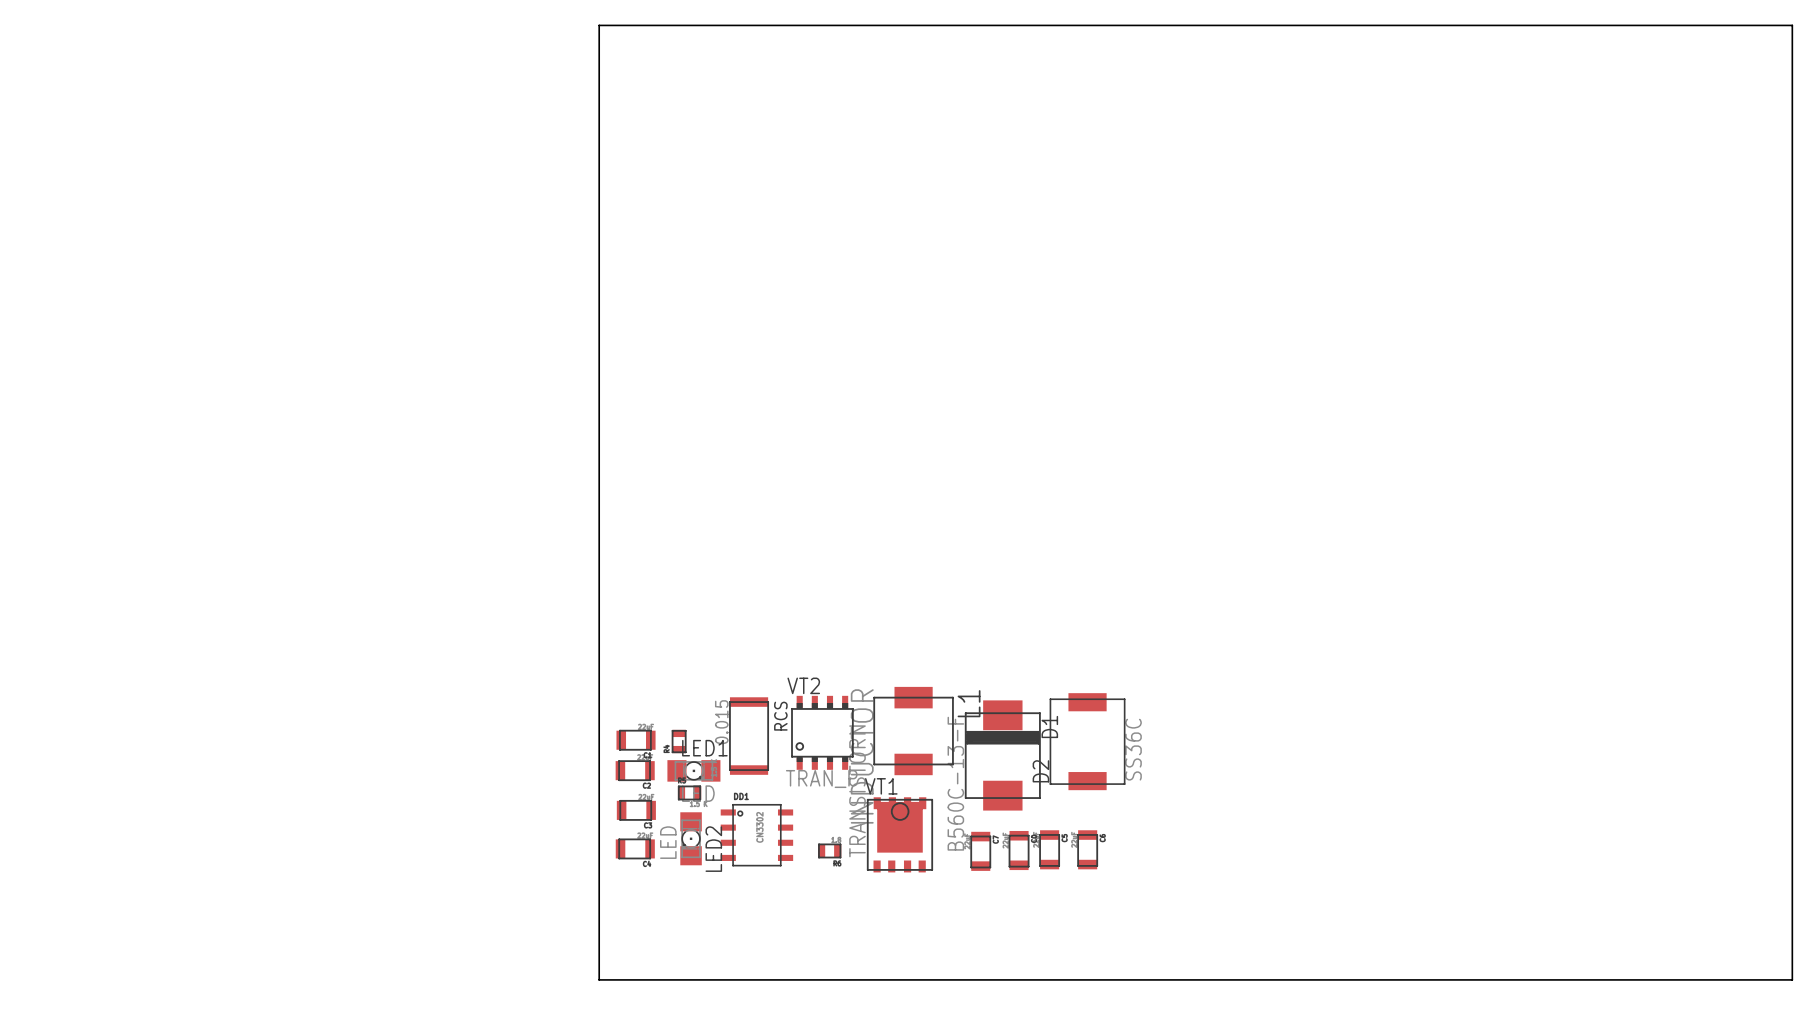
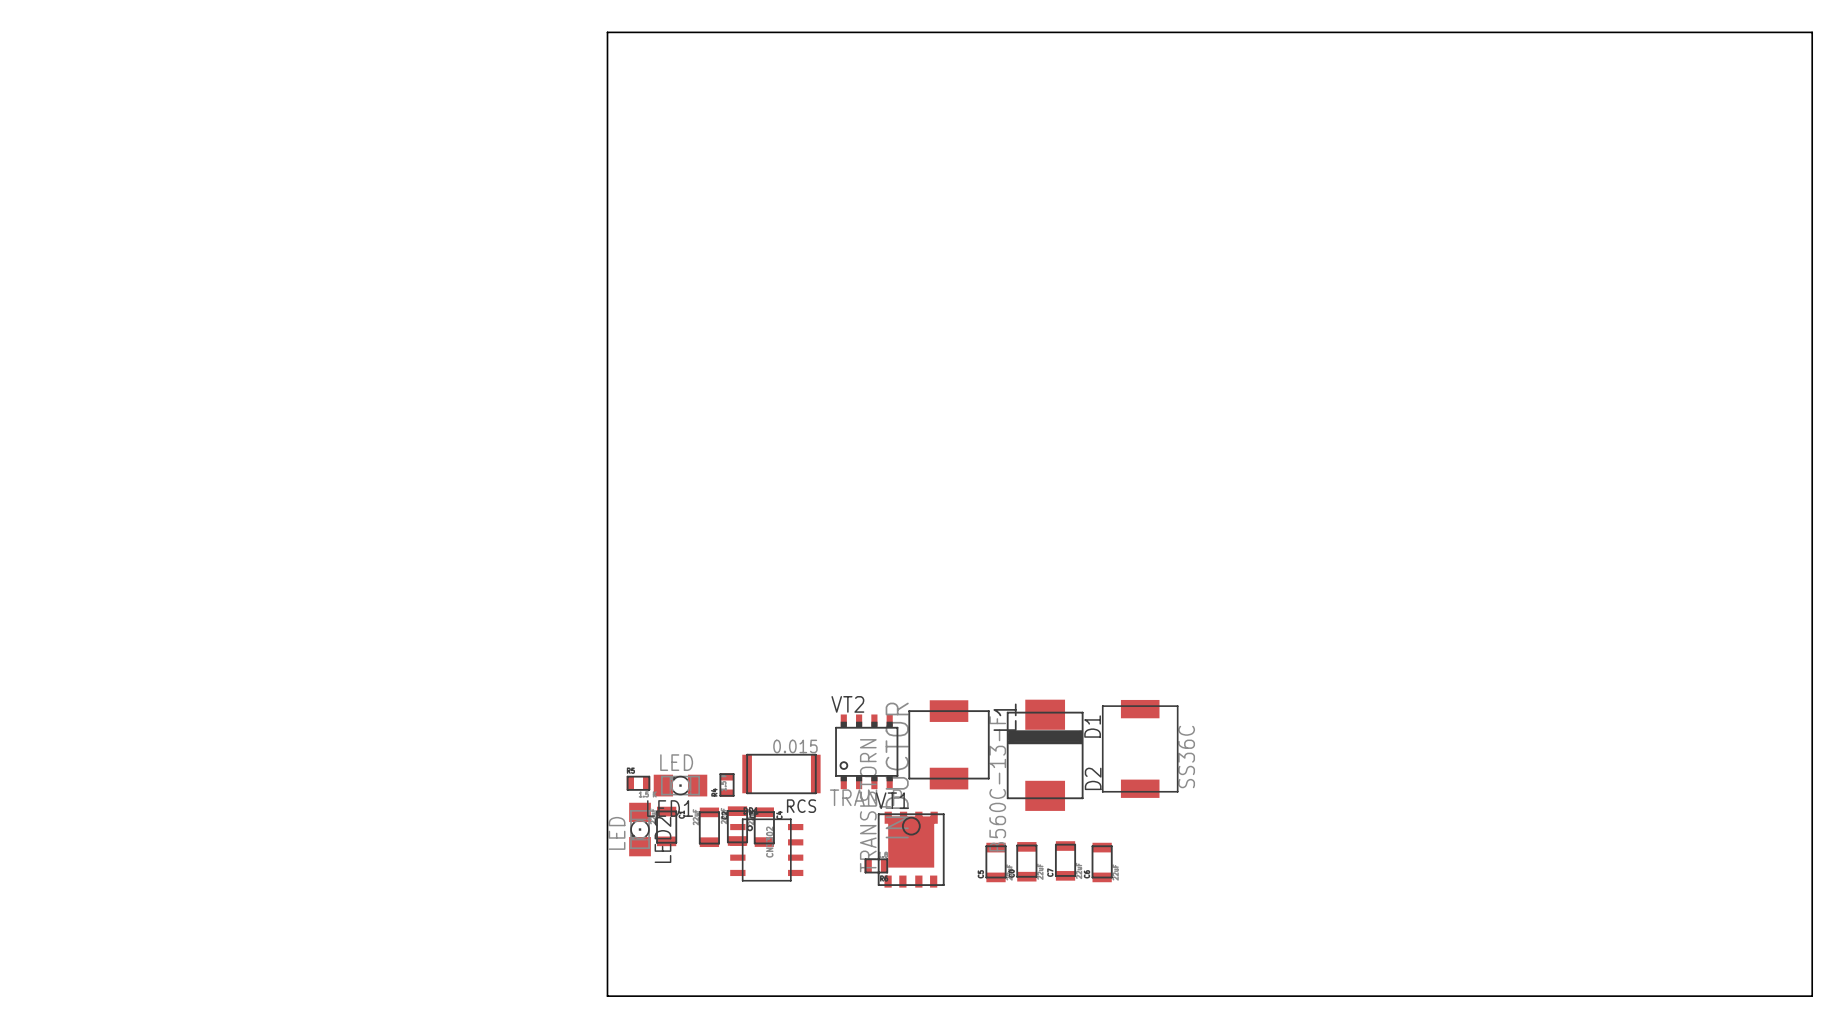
L1 position: (913, 731) -> (949, 744)
VT2 position: (822, 732) -> (866, 751)
RCS rotation: 0° (749, 736) -> 90° clockwise (781, 774)
part rotation: 0° (636, 740) -> 90° counterclockwise (666, 826)
part position: (636, 740) -> (666, 826)
part position: (679, 741) -> (727, 784)
D2 position: (1087, 741) -> (1140, 748)
D1 position: (1002, 755) -> (1045, 755)
part rotation: 0° (635, 770) -> 90° counterclockwise (709, 827)
part position: (635, 770) -> (709, 827)
LED1 rotation: 0° (693, 770) -> 180° (680, 785)
part position: (689, 792) -> (638, 783)
part rotation: 0° (636, 810) -> 90° counterclockwise (737, 826)
part position: (636, 810) -> (737, 826)
LED2 position: (691, 838) -> (640, 829)
part rotation: 0° (635, 848) -> 90° counterclockwise (764, 827)
part position: (635, 848) -> (764, 827)
part rotation: 0° (1049, 849) -> 180° (996, 862)
part position: (1049, 849) -> (996, 862)
part rotation: 0° (1087, 849) -> 180° (1102, 862)
part position: (829, 850) -> (876, 865)
part rotation: 0° (1019, 850) -> 180° (1026, 861)
part rotation: 0° (980, 851) -> 180° (1065, 860)
part position: (980, 851) -> (1065, 860)

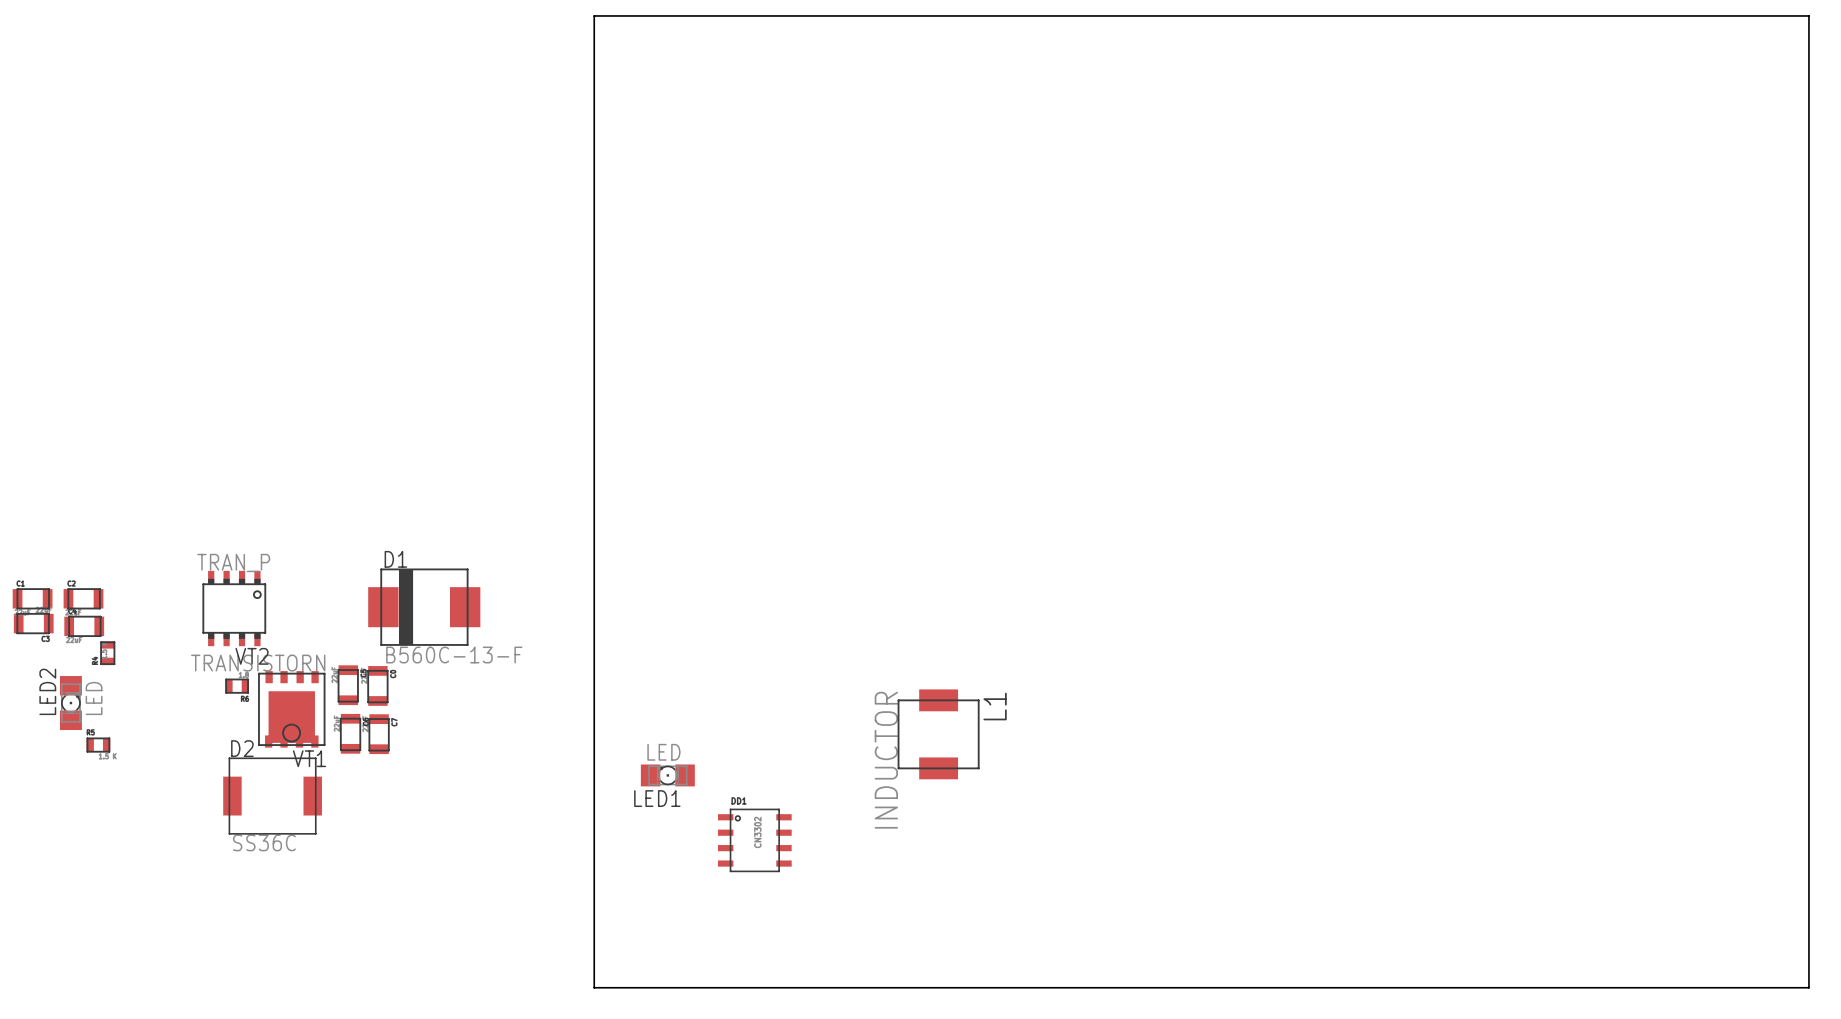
D2 rotation: 0° (1140, 748) -> 90° clockwise (272, 796)
D2 position: (1140, 748) -> (272, 796)
VT2 rotation: 0° (866, 751) -> 180° (234, 608)
VT2 position: (866, 751) -> (234, 608)
D1 rotation: 0° (1045, 755) -> 90° counterclockwise (424, 607)
D1 position: (1045, 755) -> (424, 607)
RCS: 0.015 (781, 774) -> none
part position: (638, 783) -> (98, 745)
part position: (727, 784) -> (107, 653)
part rotation: 0° (666, 826) -> 90° counterclockwise (32, 598)
part position: (666, 826) -> (32, 598)
part rotation: 0° (737, 826) -> 90° clockwise (33, 623)
part position: (737, 826) -> (33, 623)
part rotation: 0° (709, 827) -> 90° counterclockwise (83, 598)
part position: (709, 827) -> (83, 598)
part rotation: 0° (764, 827) -> 90° counterclockwise (84, 626)
part position: (764, 827) -> (84, 626)
LED2 rotation: 0° (640, 829) -> 180° (70, 703)
LED2 position: (640, 829) -> (70, 703)
VT1 rotation: 0° (911, 849) -> 180° (291, 709)
VT1 position: (911, 849) -> (291, 709)
part rotation: 0° (1065, 860) -> 180° (379, 734)
part position: (1065, 860) -> (379, 734)
part rotation: 0° (1026, 861) -> 180° (377, 685)
part position: (1026, 861) -> (377, 685)
part rotation: 0° (996, 862) -> 180° (348, 685)
part position: (996, 862) -> (348, 685)
part rotation: 0° (1102, 862) -> 180° (350, 733)
part position: (1102, 862) -> (350, 733)
part position: (876, 865) -> (237, 686)

